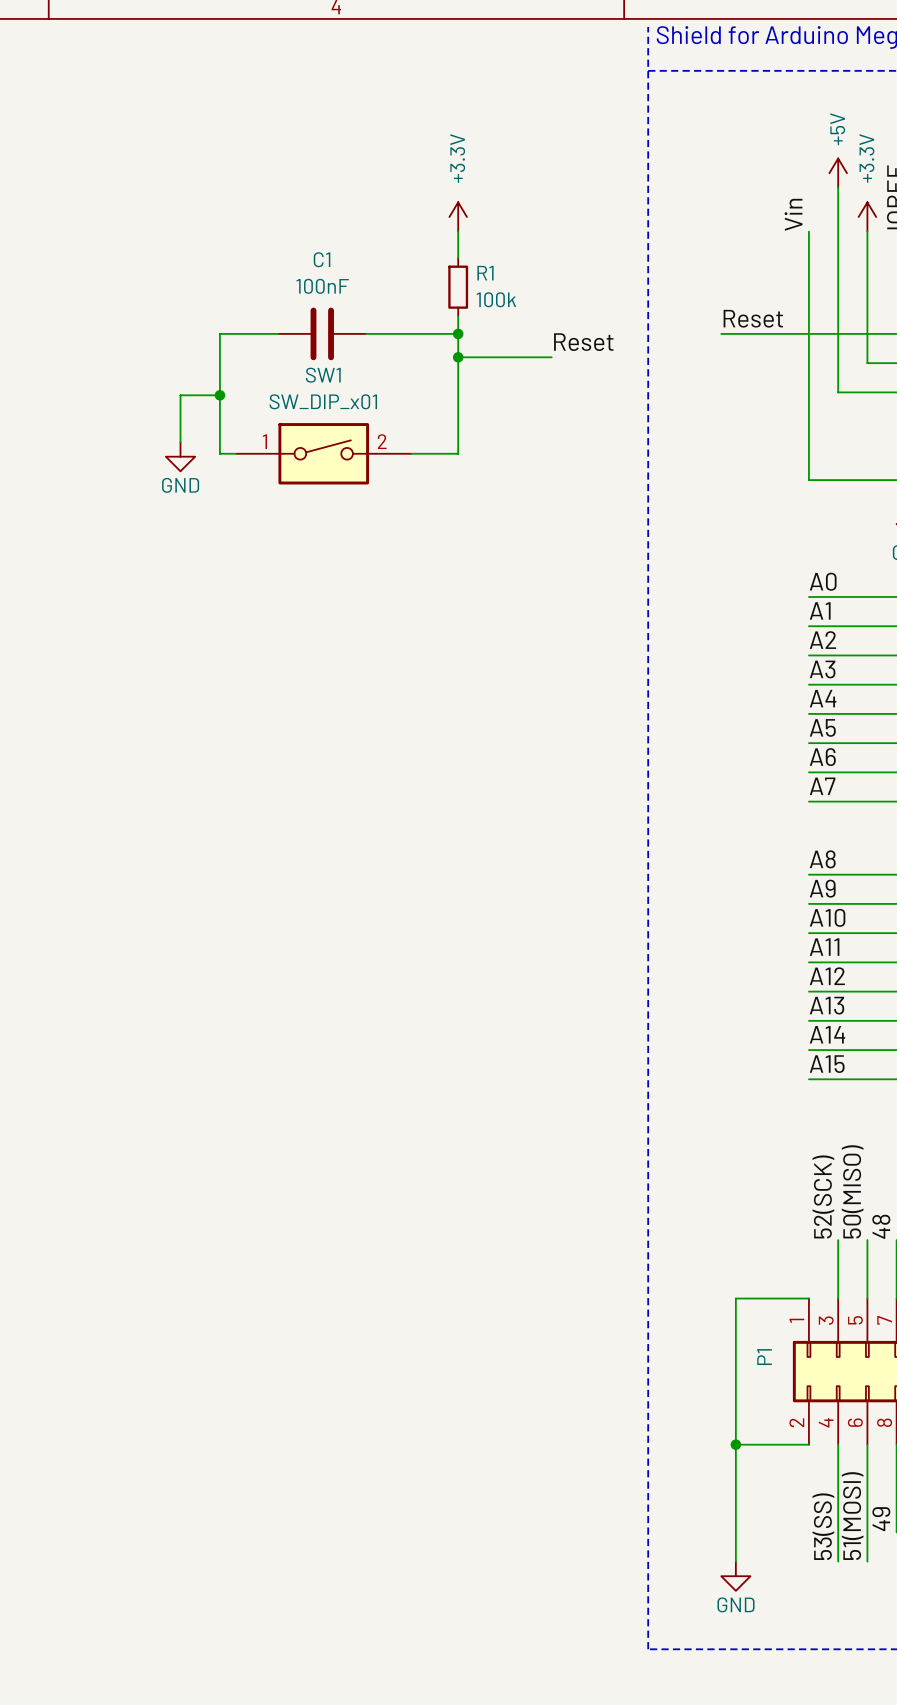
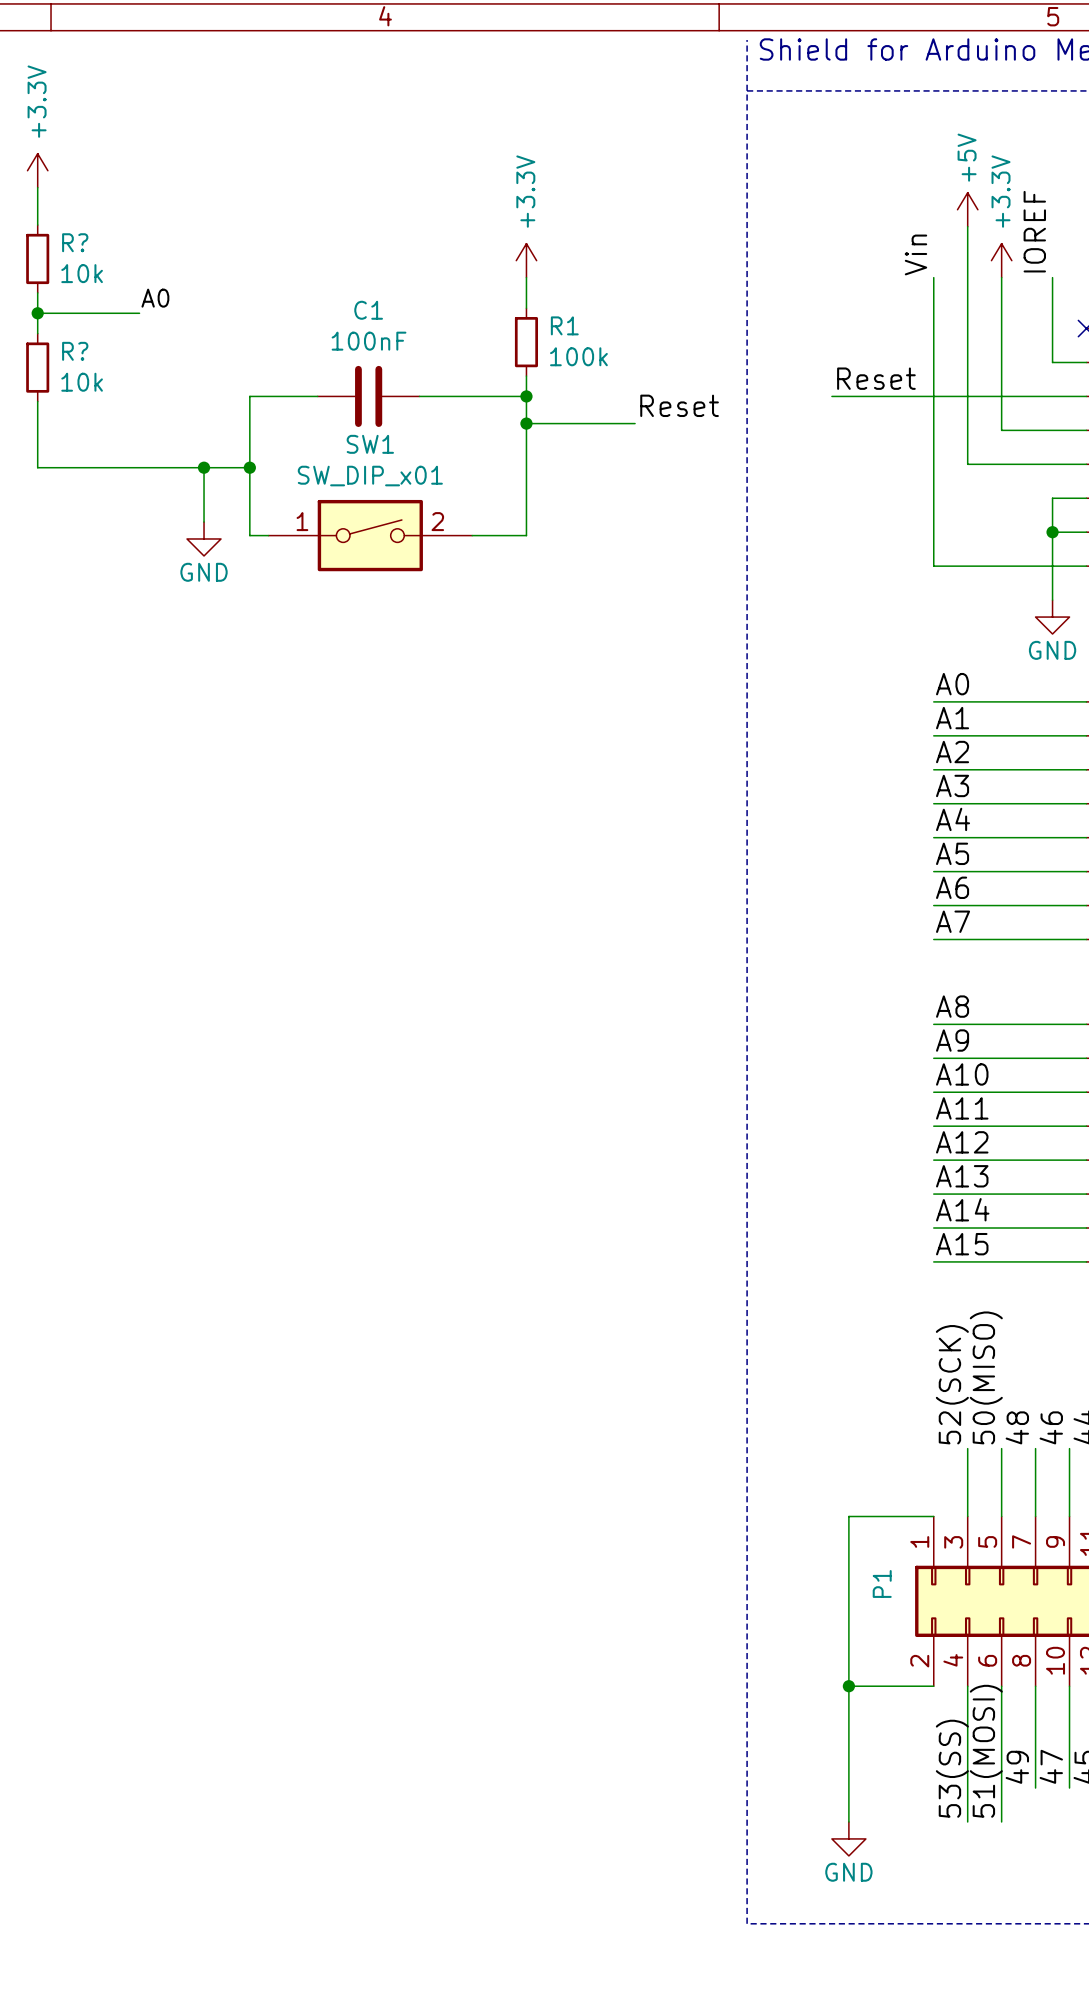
power symbol: none -> +3.3V (37, 170)
wire: none -> (37, 187) (37, 225)
R?: none -> 10k (37, 258)
wire: none -> (37, 292) (37, 333)
label: none -> A0 (155, 298)
wire: none -> (37, 313) (139, 313)
junction: none -> (37, 313)
R?: none -> 10k (37, 367)
wire: none -> (37, 401) (37, 467) (204, 467)
junction: none -> (204, 467)

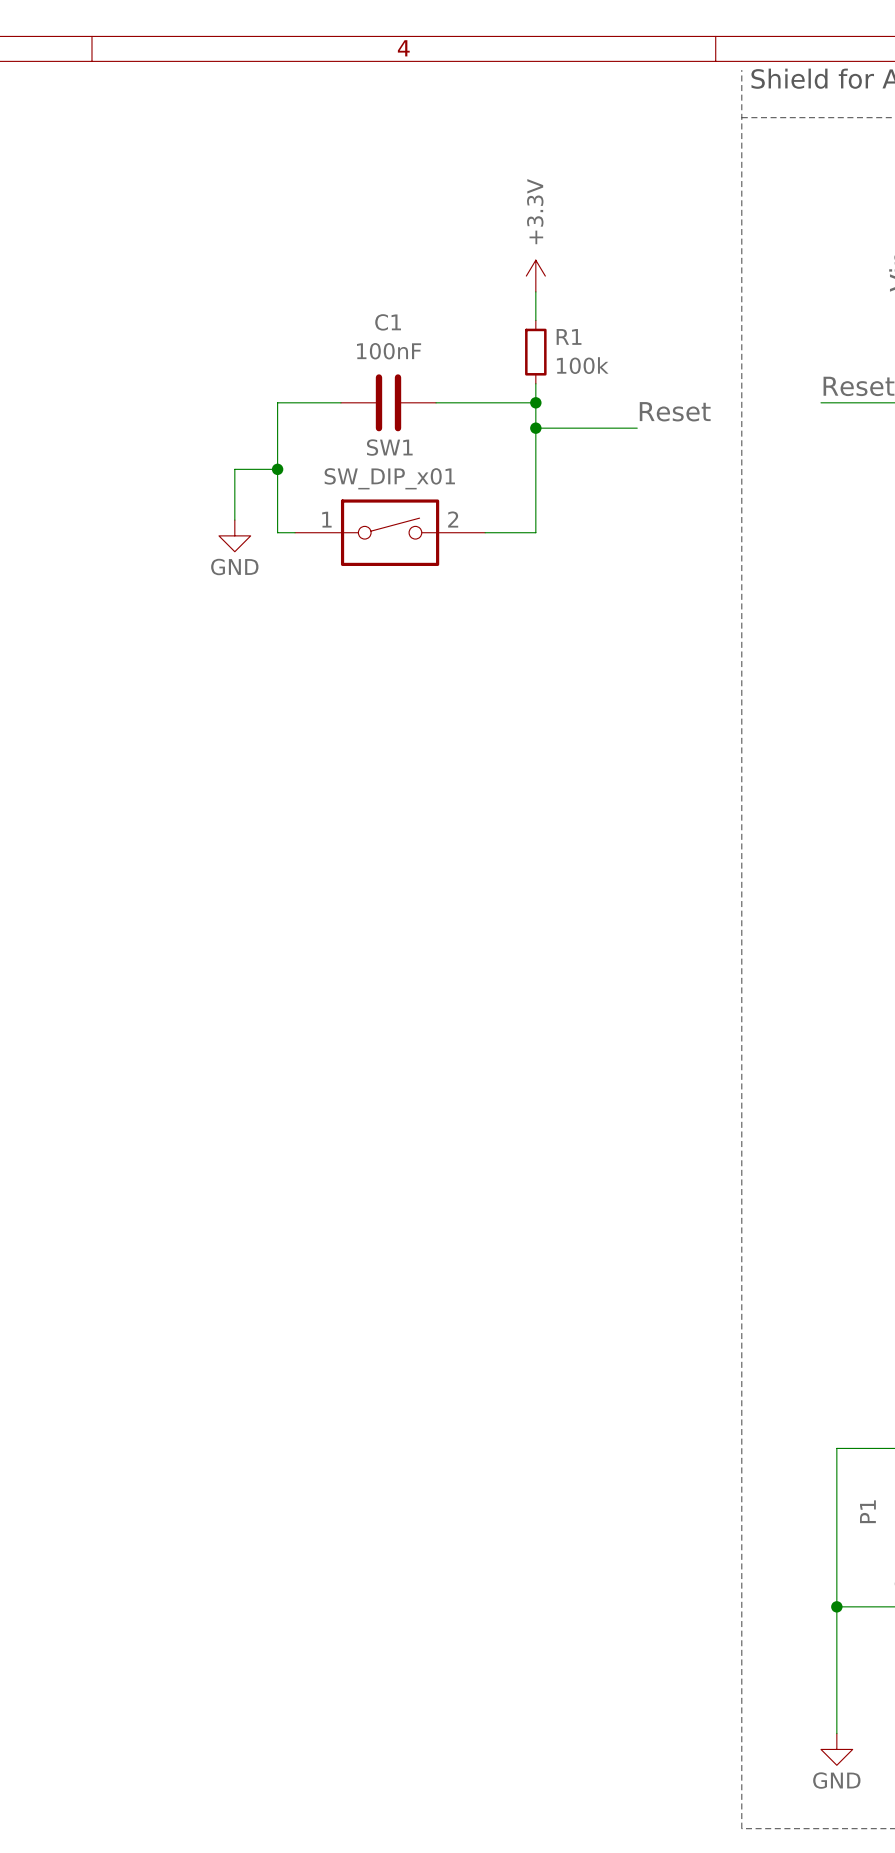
power symbol: +3.3V (37, 170) -> none
wire: (37, 187) (37, 225) -> none
R?: 10k (37, 258) -> none
wire: (37, 292) (37, 333) -> none
label: A0 (155, 298) -> none
wire: (37, 313) (139, 313) -> none
junction: (37, 313) -> none
R?: 10k (37, 367) -> none
wire: (37, 401) (37, 467) (204, 467) -> none
junction: (204, 467) -> none

